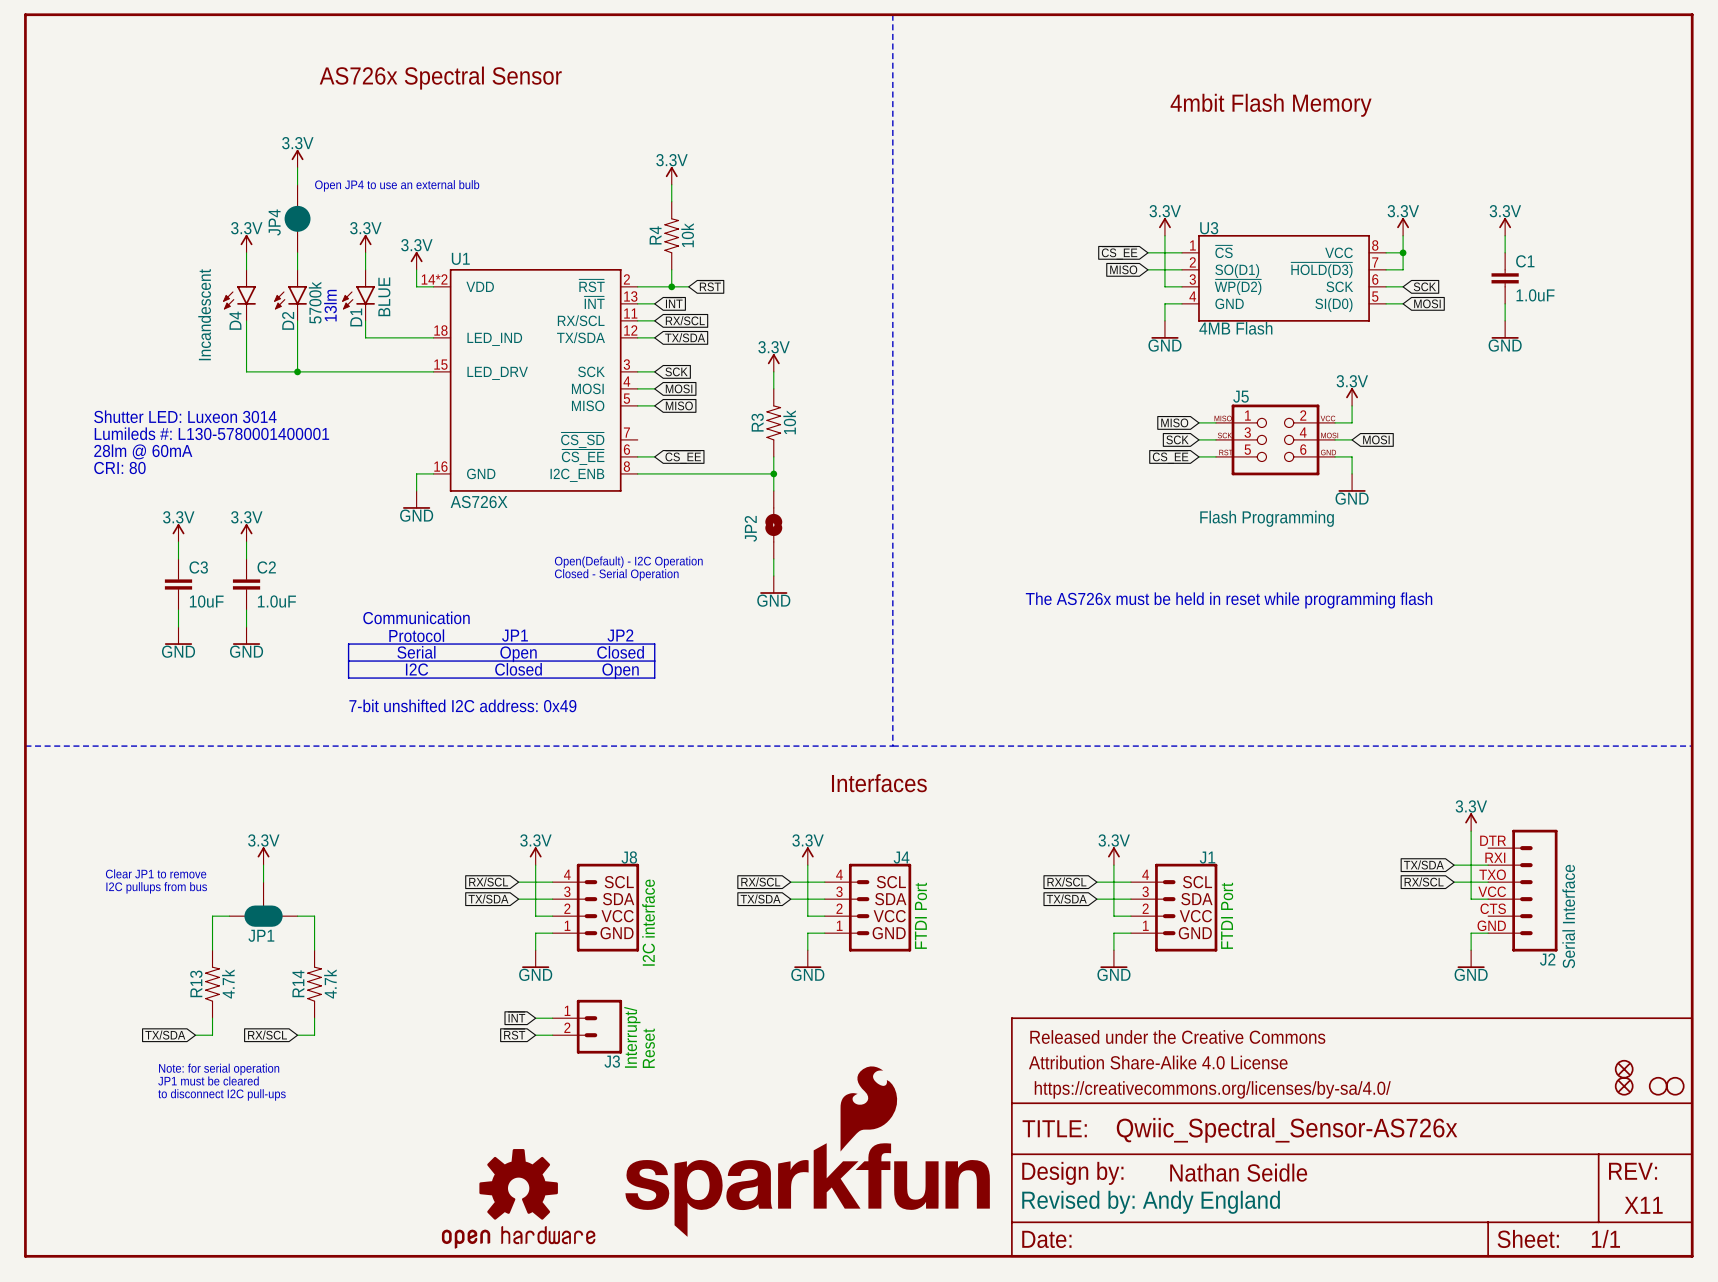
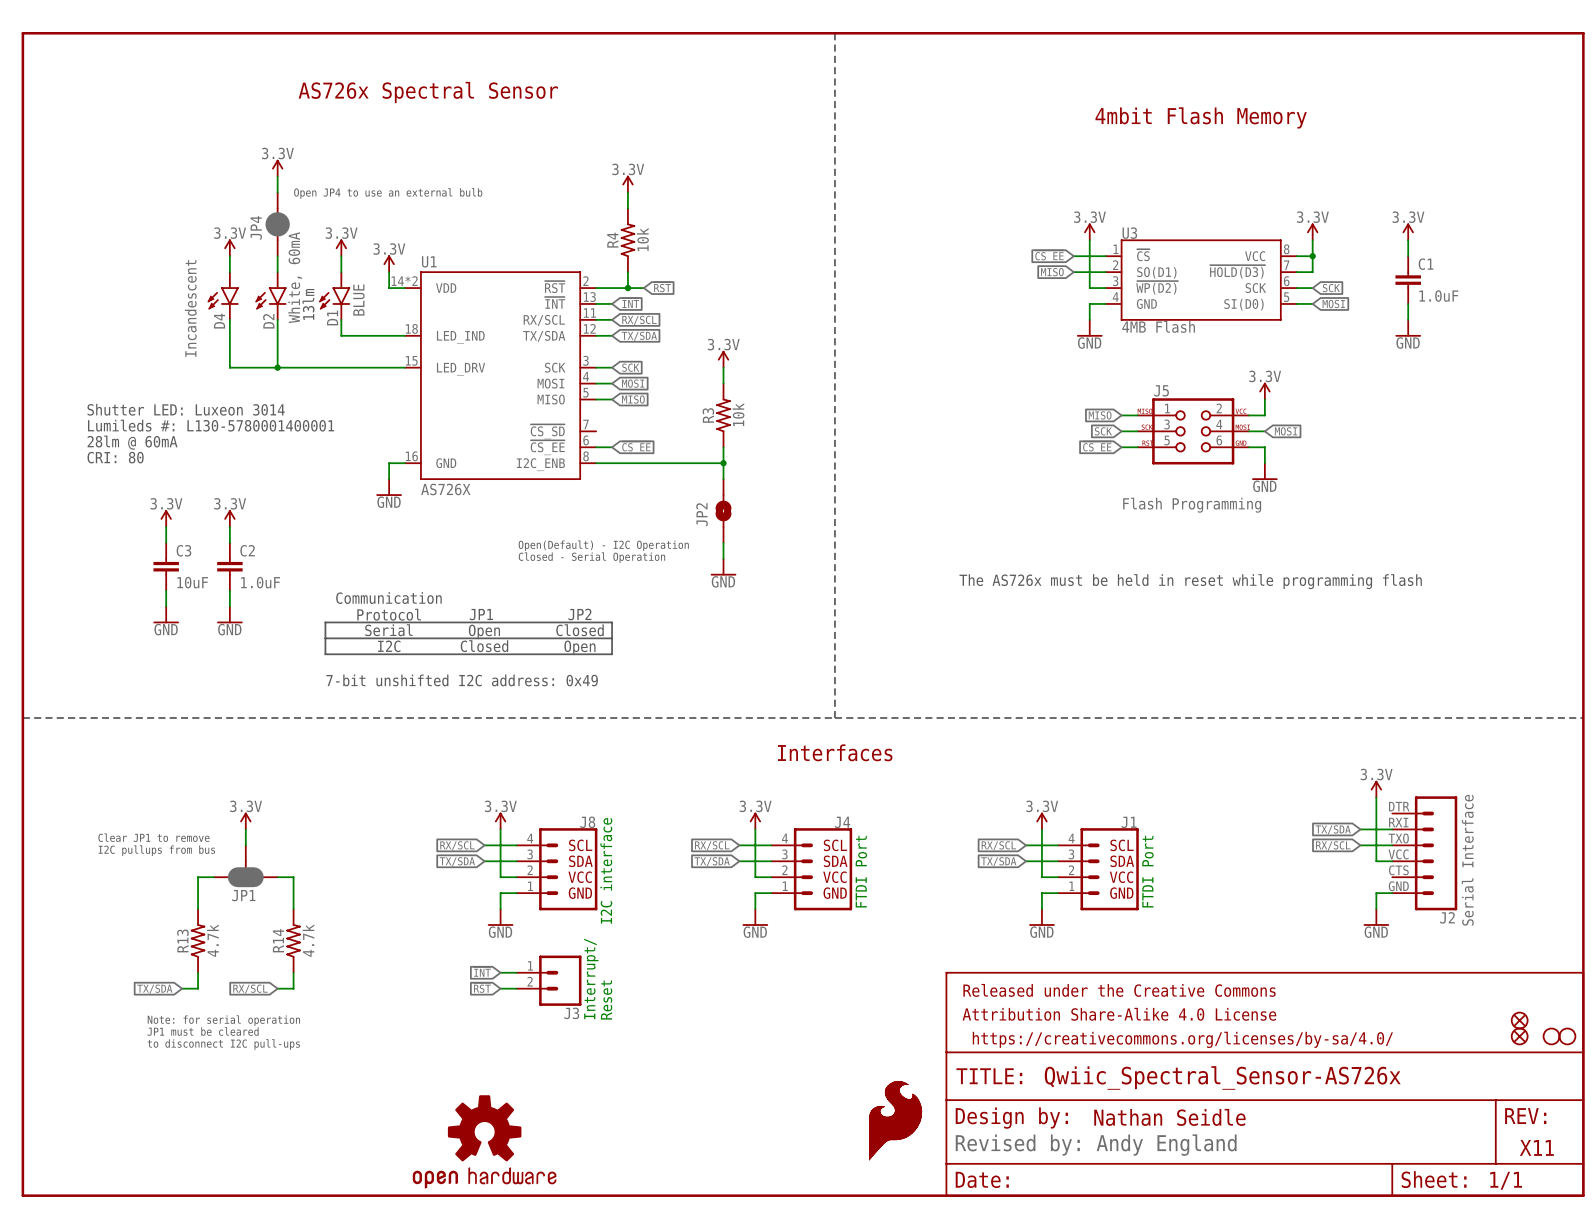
D2 value: 5700k (315, 302) -> White, 60mA (295, 277)
part: (807, 1151) -> none
part: none -> (895, 1120)

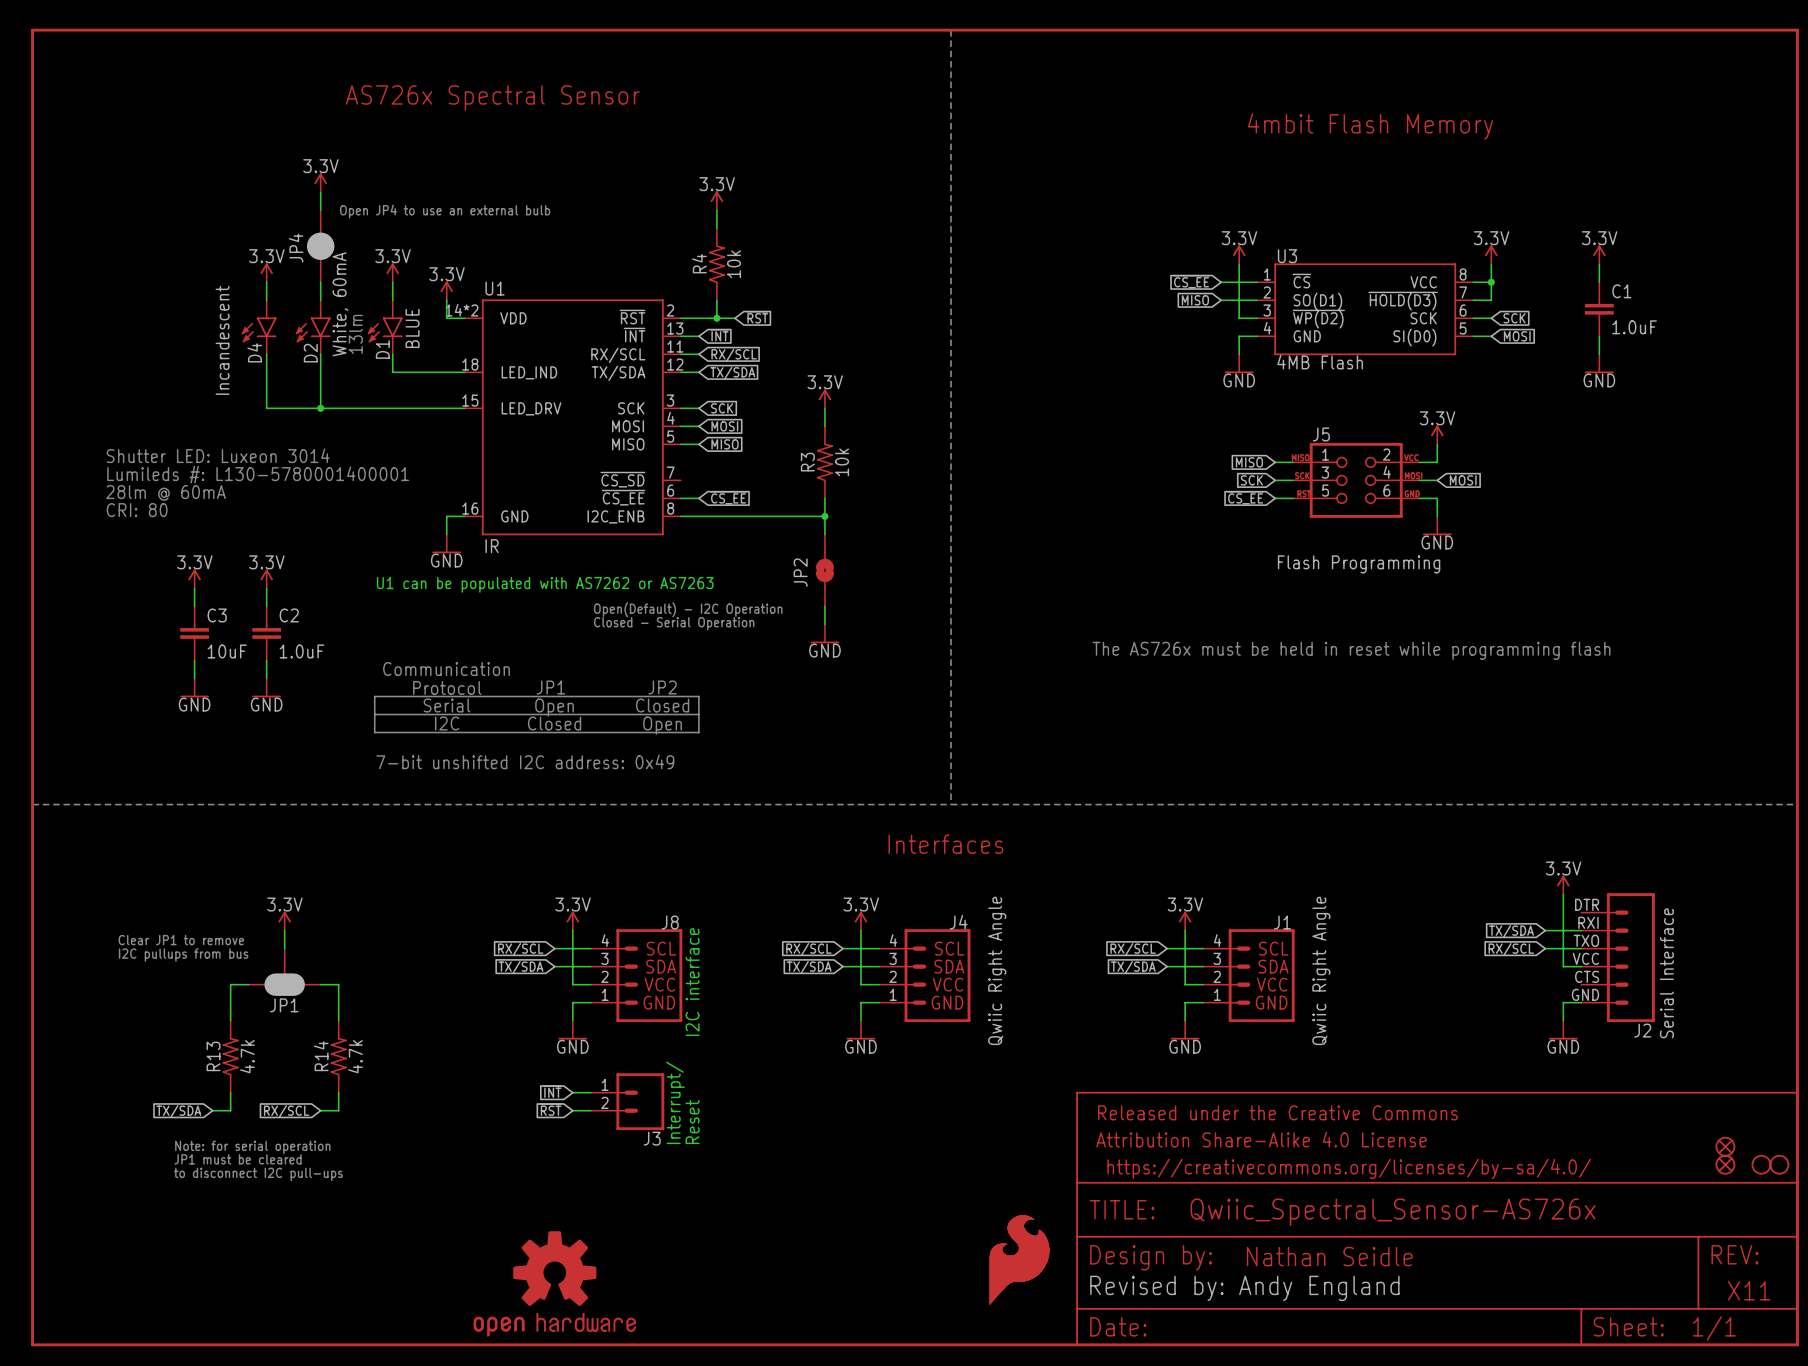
U1 value: AS726X (445, 489) -> IR (492, 546)
text: none -> U1 can be populated with AS7262 or AS7263 (545, 584)
J4 value: none -> Qwiic Right Angle (997, 970)
J1 value: none -> Qwiic Right Angle (1321, 970)
text: FTDI Port (861, 871) -> none
text: FTDI Port (1147, 871) -> none

